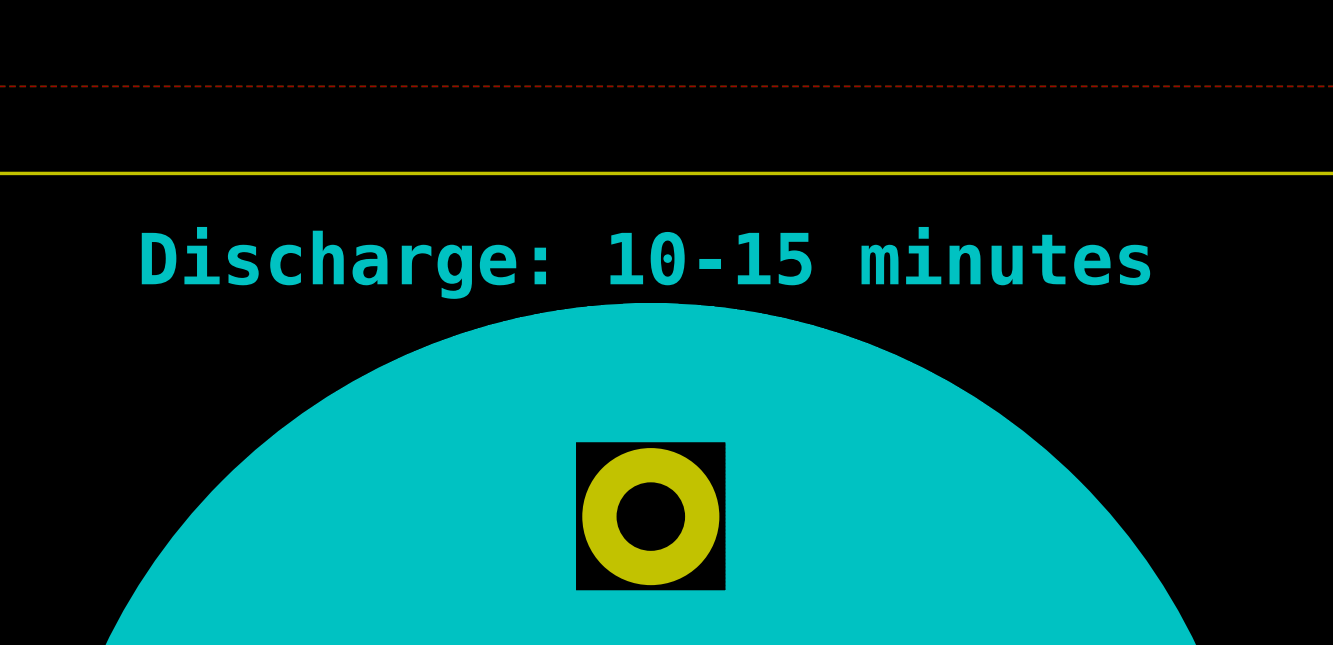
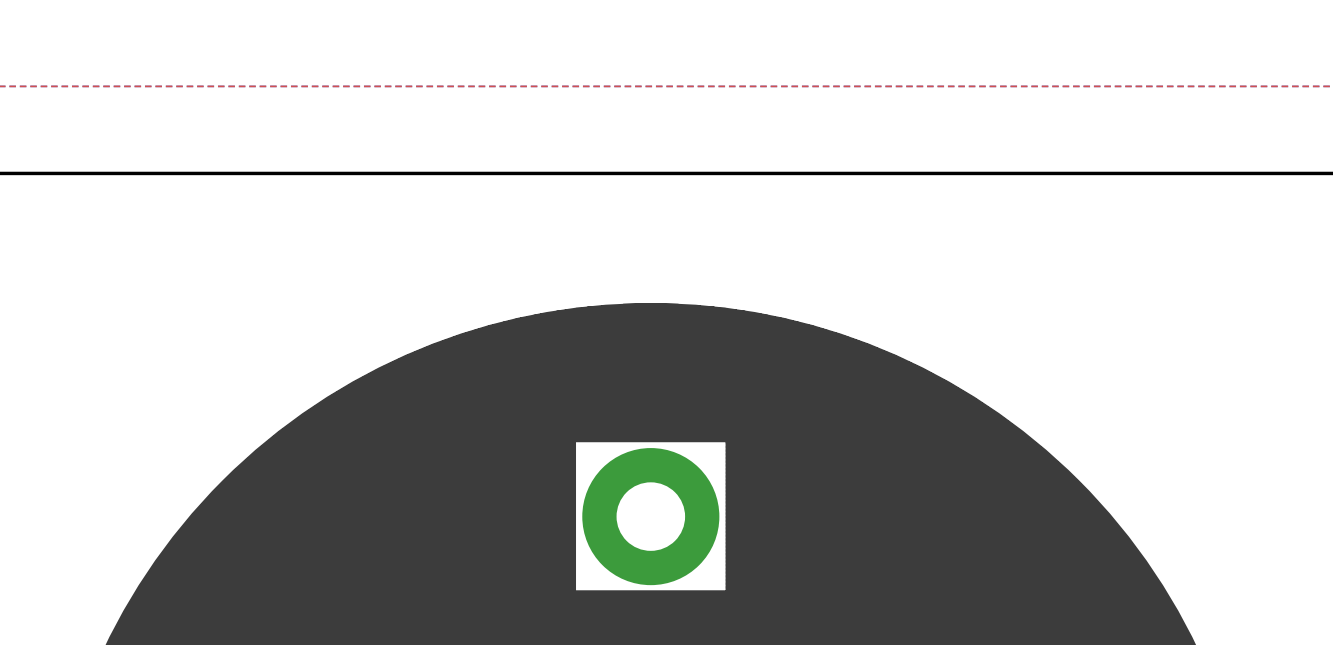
text: Discharge: 10-15 minutes (645, 262) -> none

